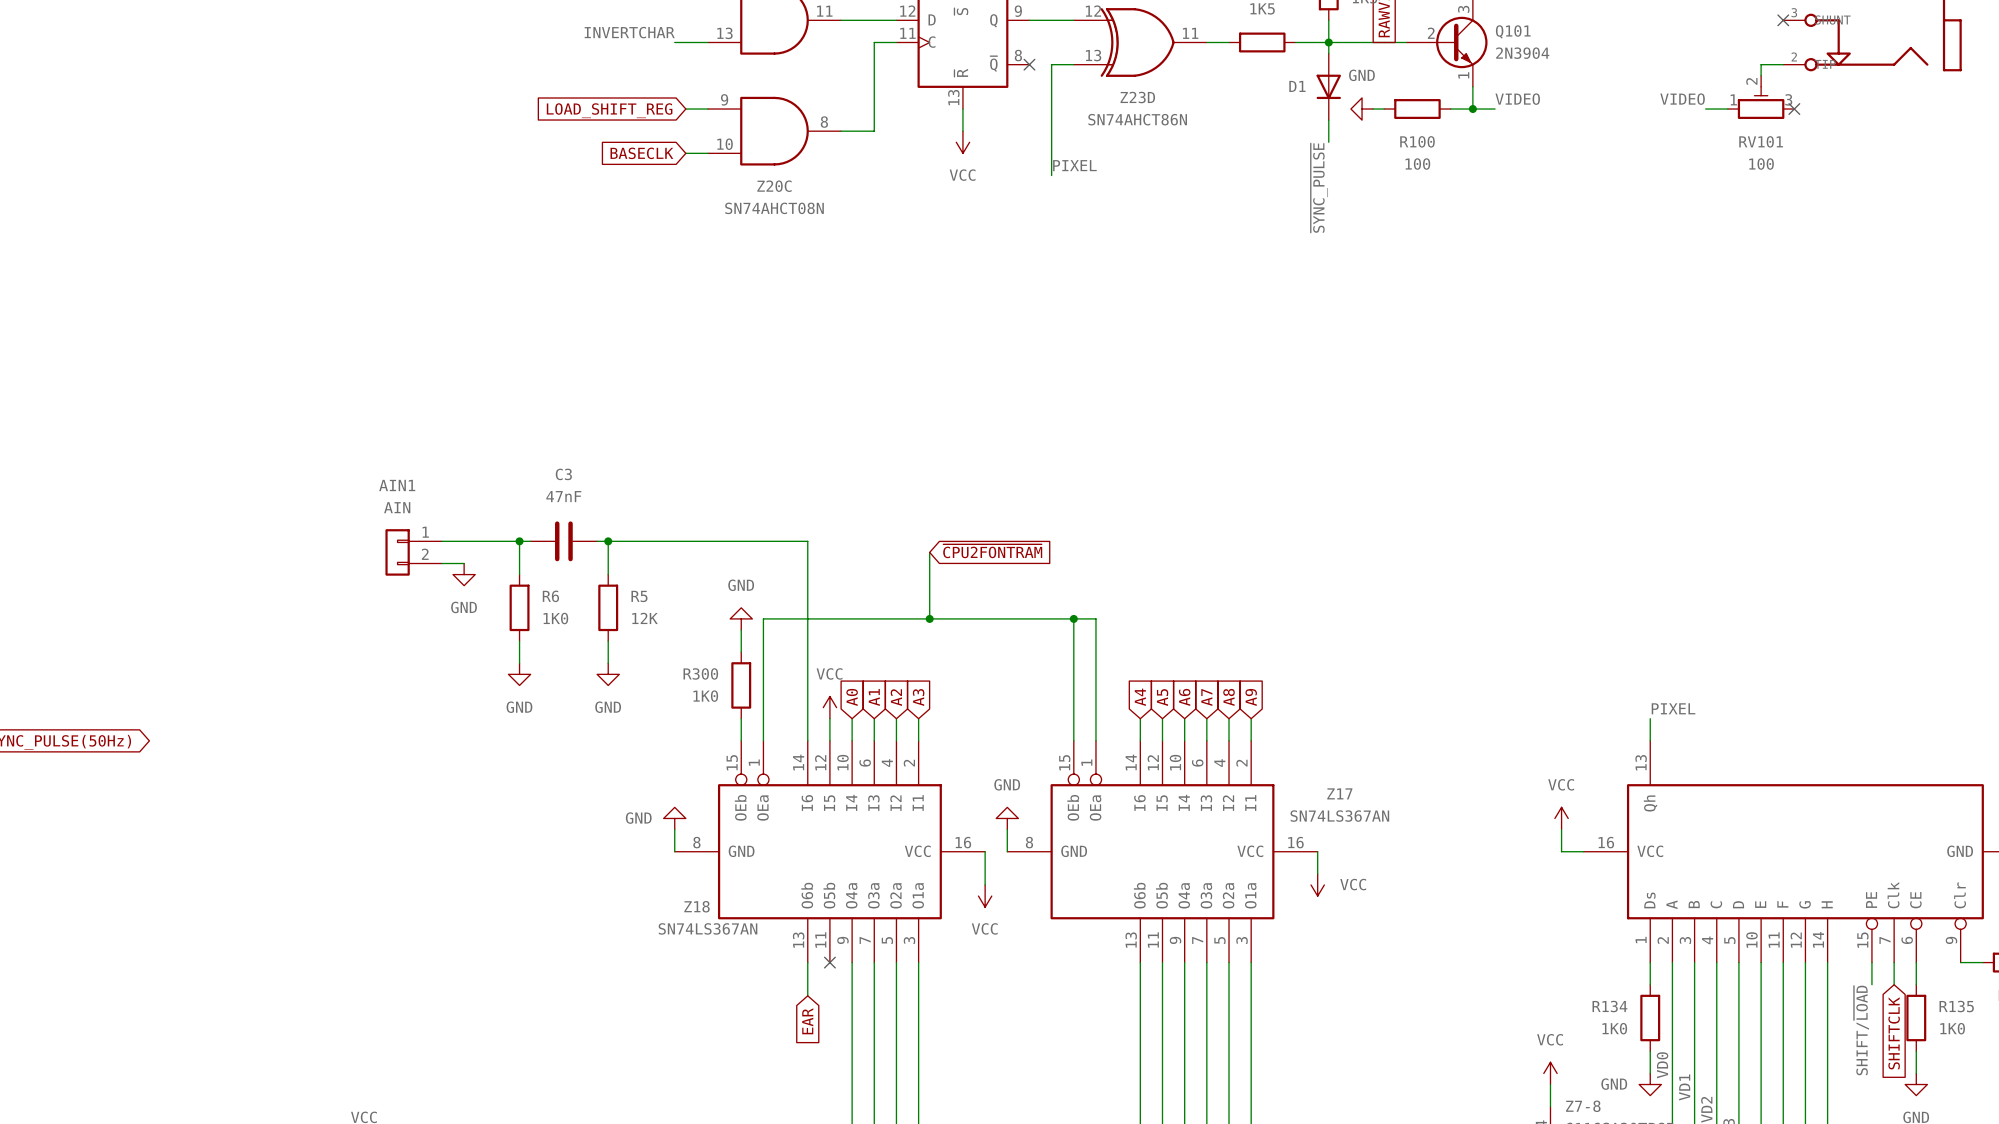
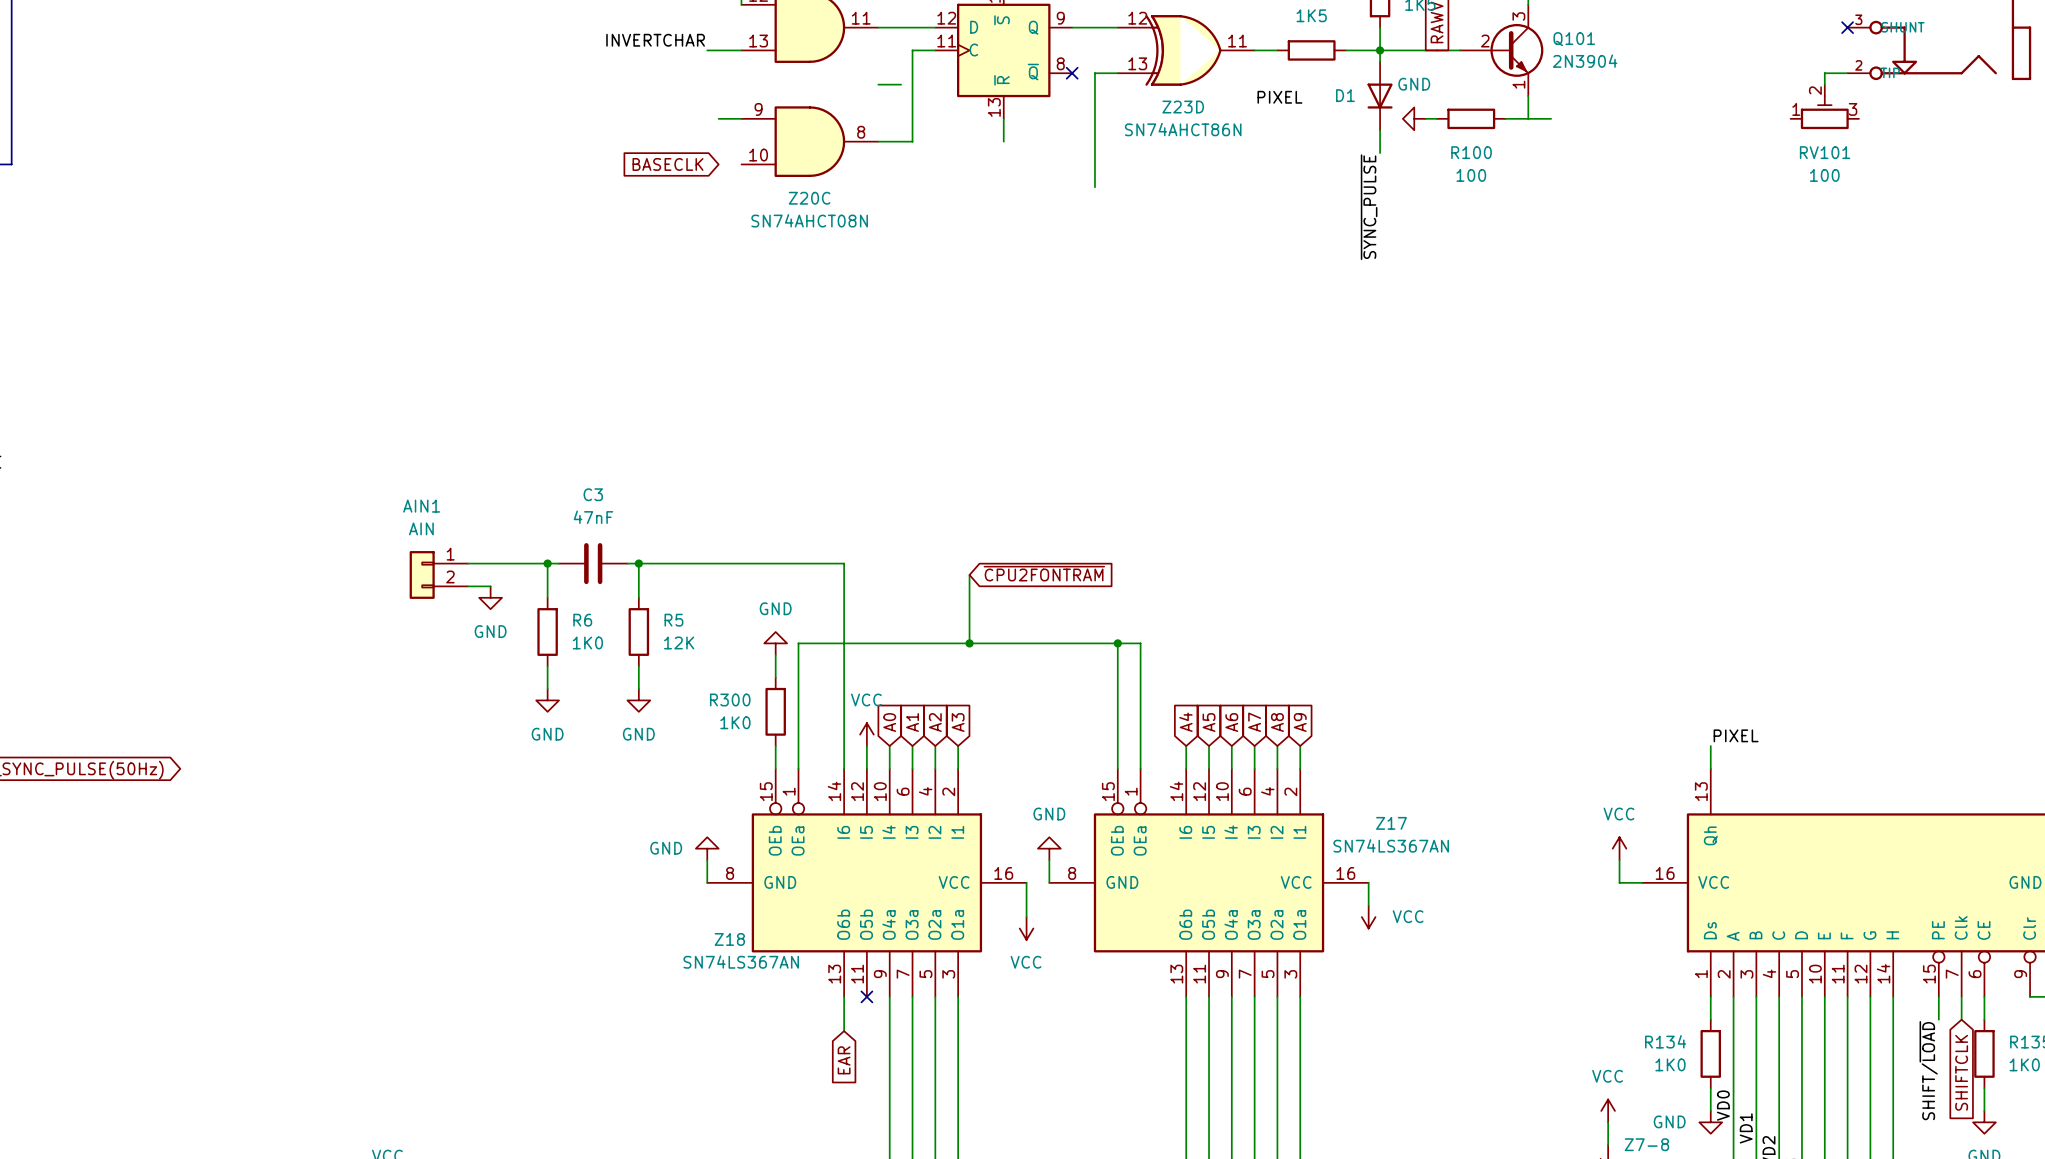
label: VIDEO (1517, 99) -> none
label: VIDEO (1682, 99) -> none
junction: (1472, 109) -> none
wire: (1705, 109) (1727, 109) -> none
no-connect mark: (1794, 109) -> none
global label: LOAD_SHIFT_REG (609, 110) -> none
power symbol: VCC (962, 142) -> none
wire: (685, 153) (707, 153) -> (878, 84) (901, 84)
label position: PIXEL (1074, 165) -> PIXEL (1279, 97)

